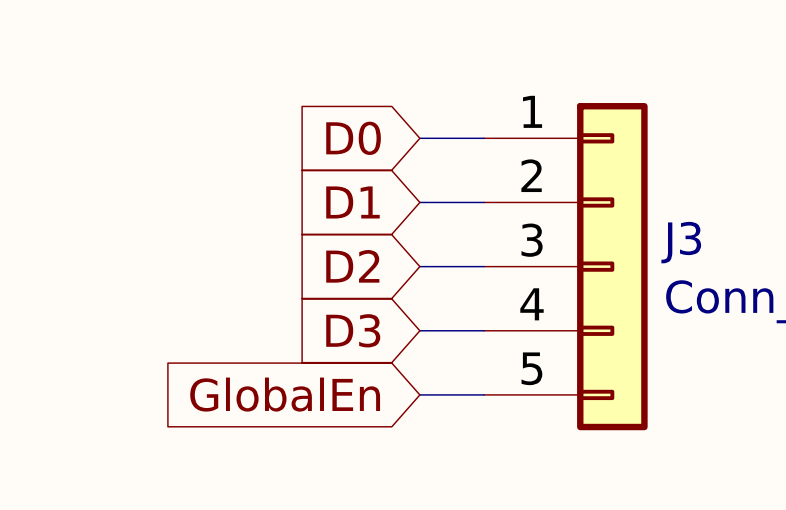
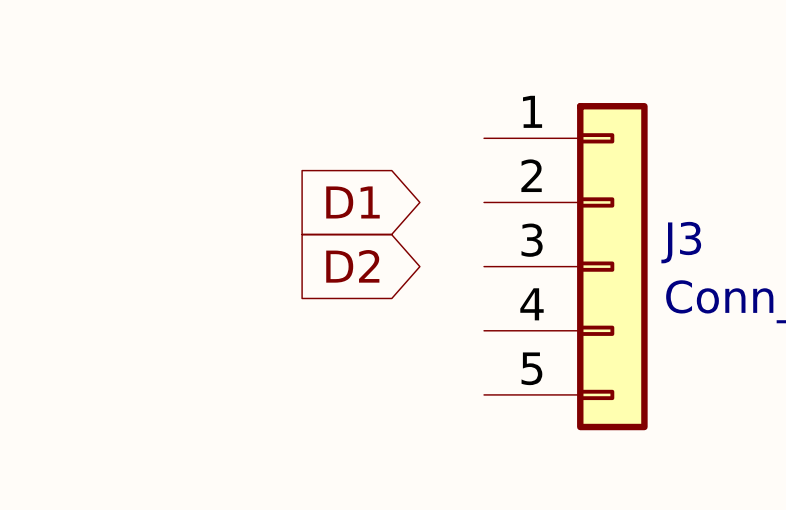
global label: D0 (353, 138) -> none
wire: (419, 138) (484, 138) -> none
wire: (419, 202) (484, 202) -> none
wire: (419, 266) (484, 266) -> none
global label: D3 (353, 330) -> none
wire: (419, 330) (484, 330) -> none
global label: GlobalEn (285, 394) -> none
wire: (419, 394) (484, 394) -> none

